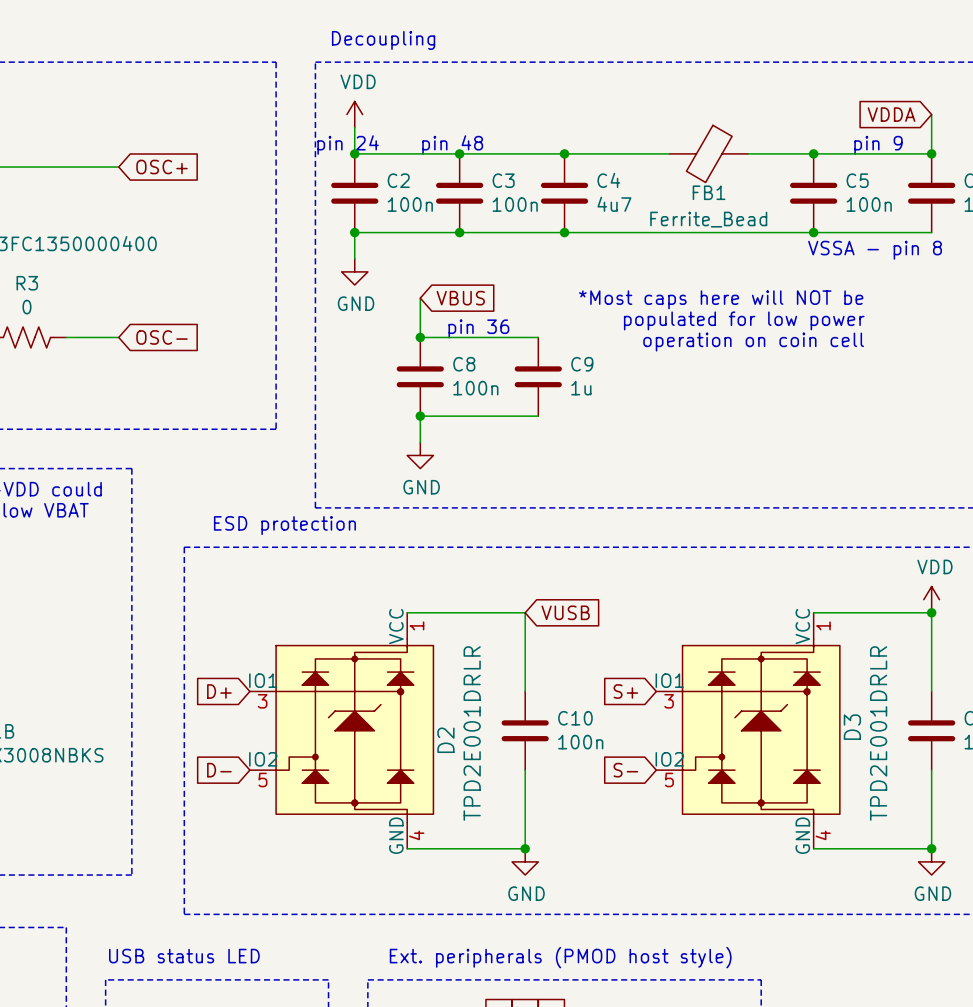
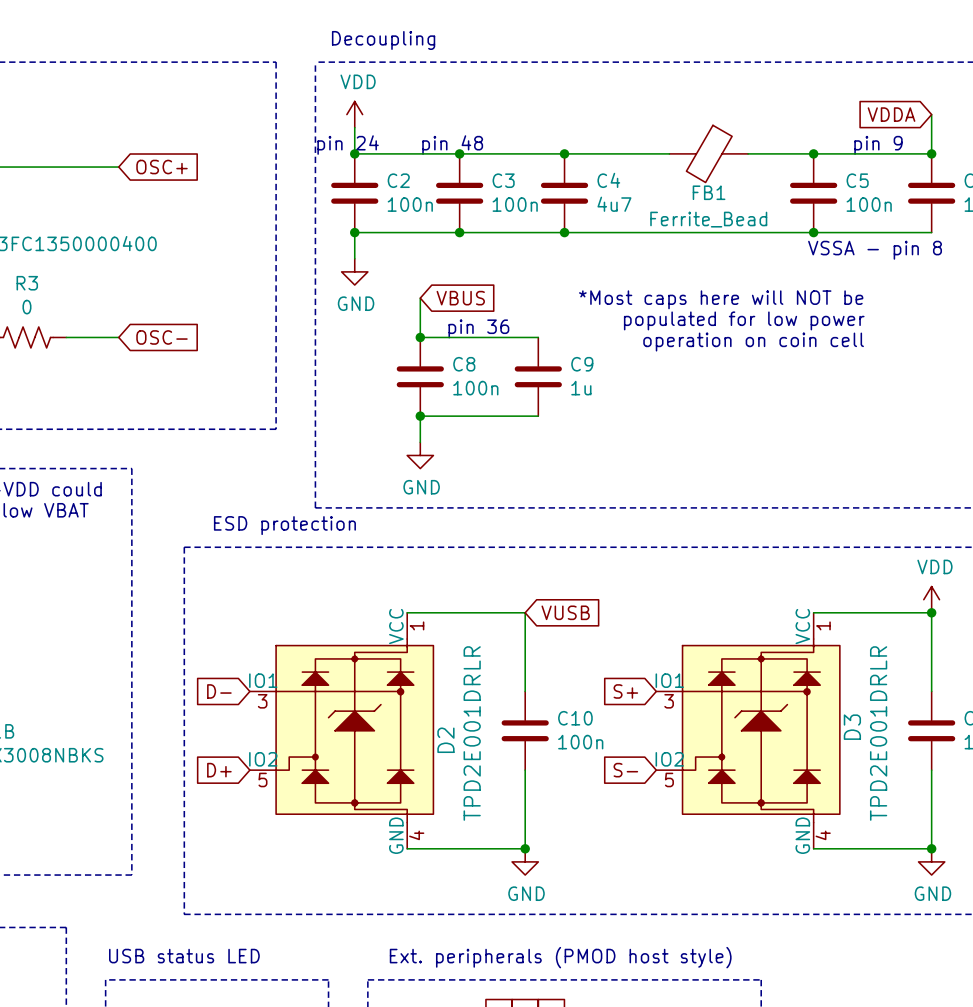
global label: D+ (219, 691) -> D- (219, 691)
global label: D- (219, 770) -> D+ (219, 770)

